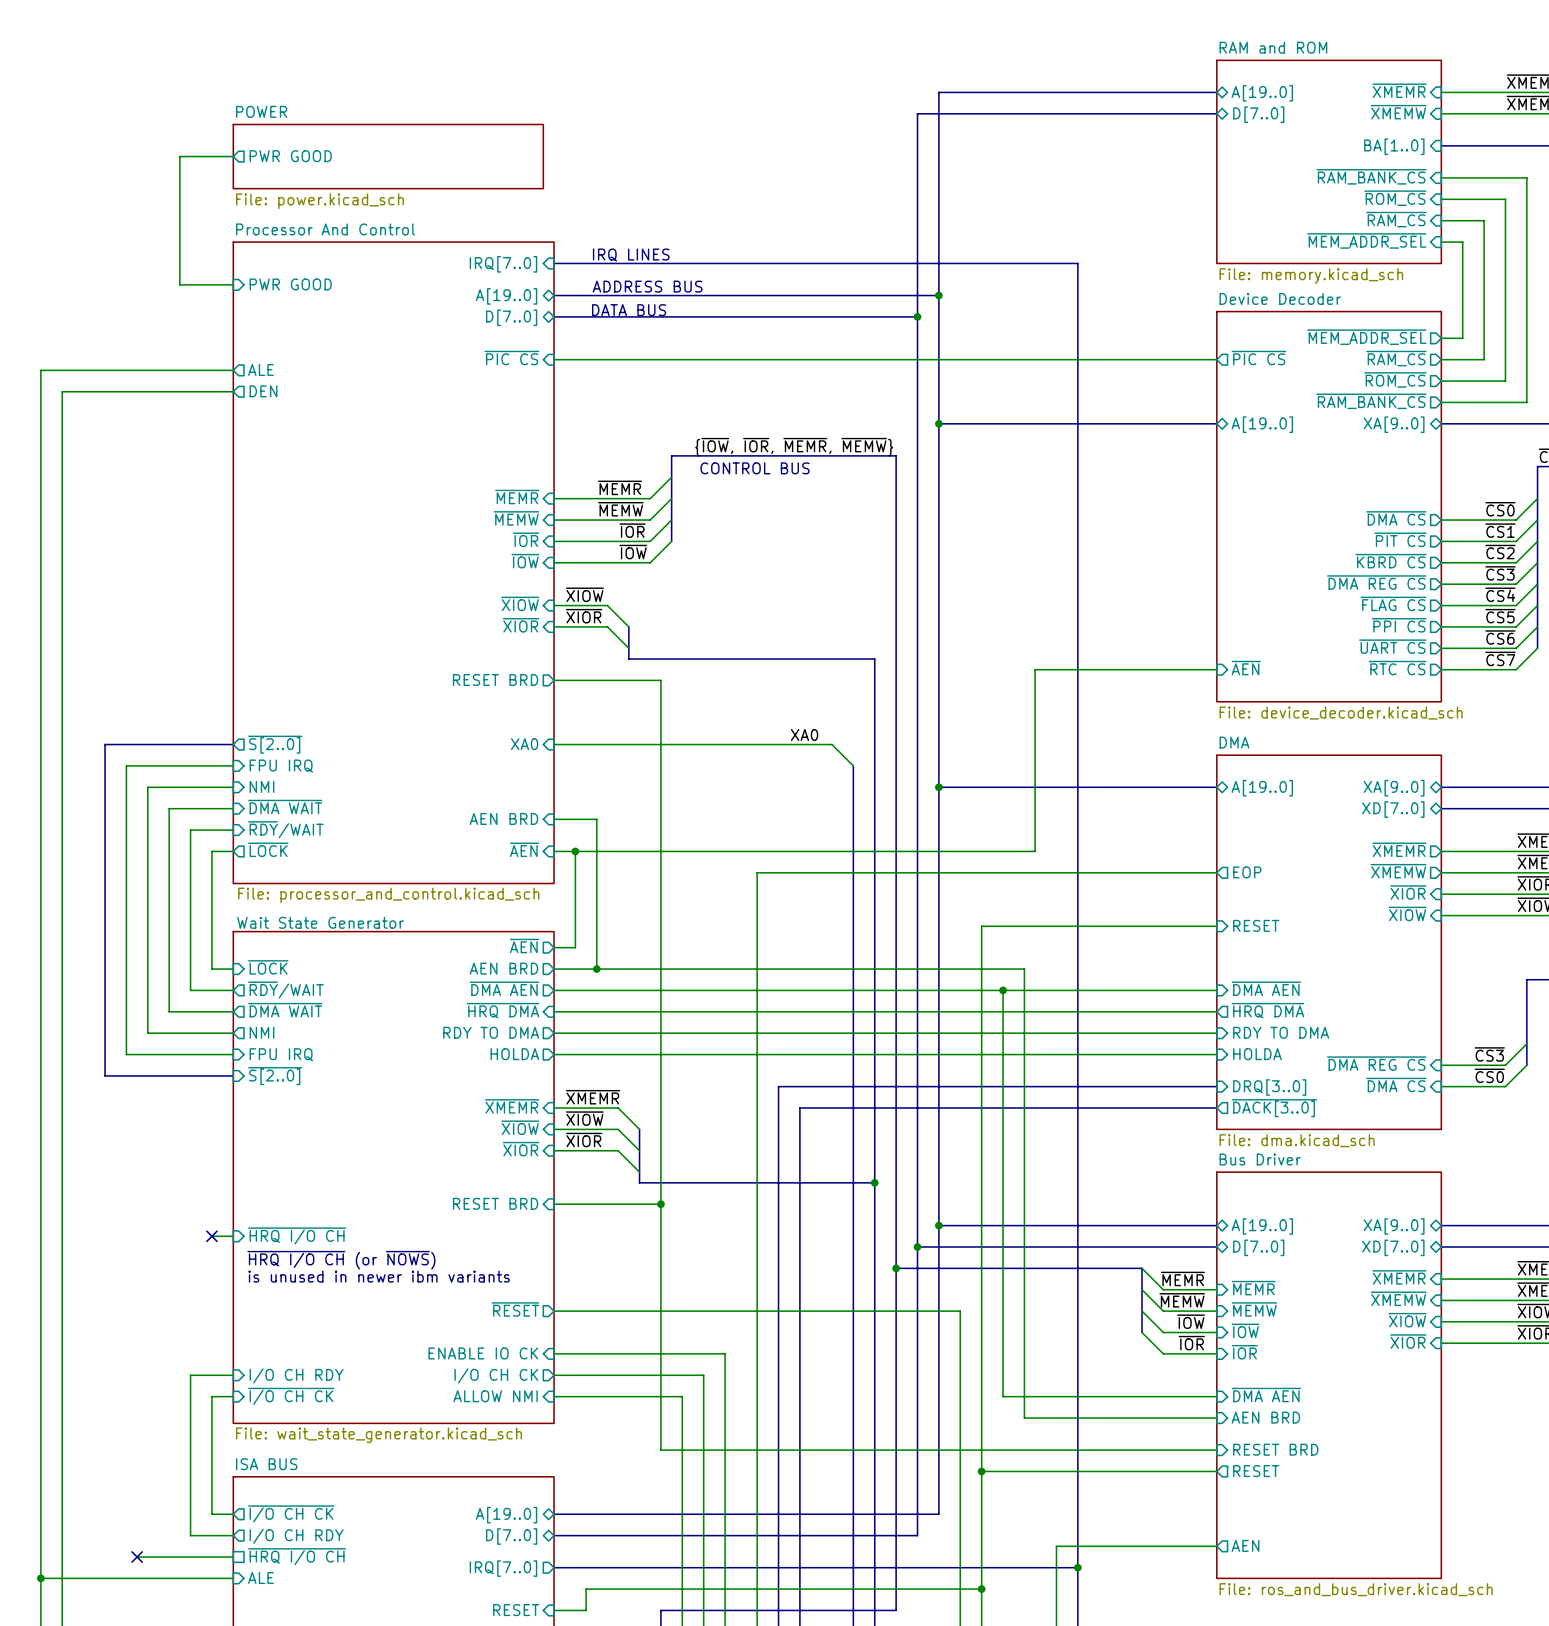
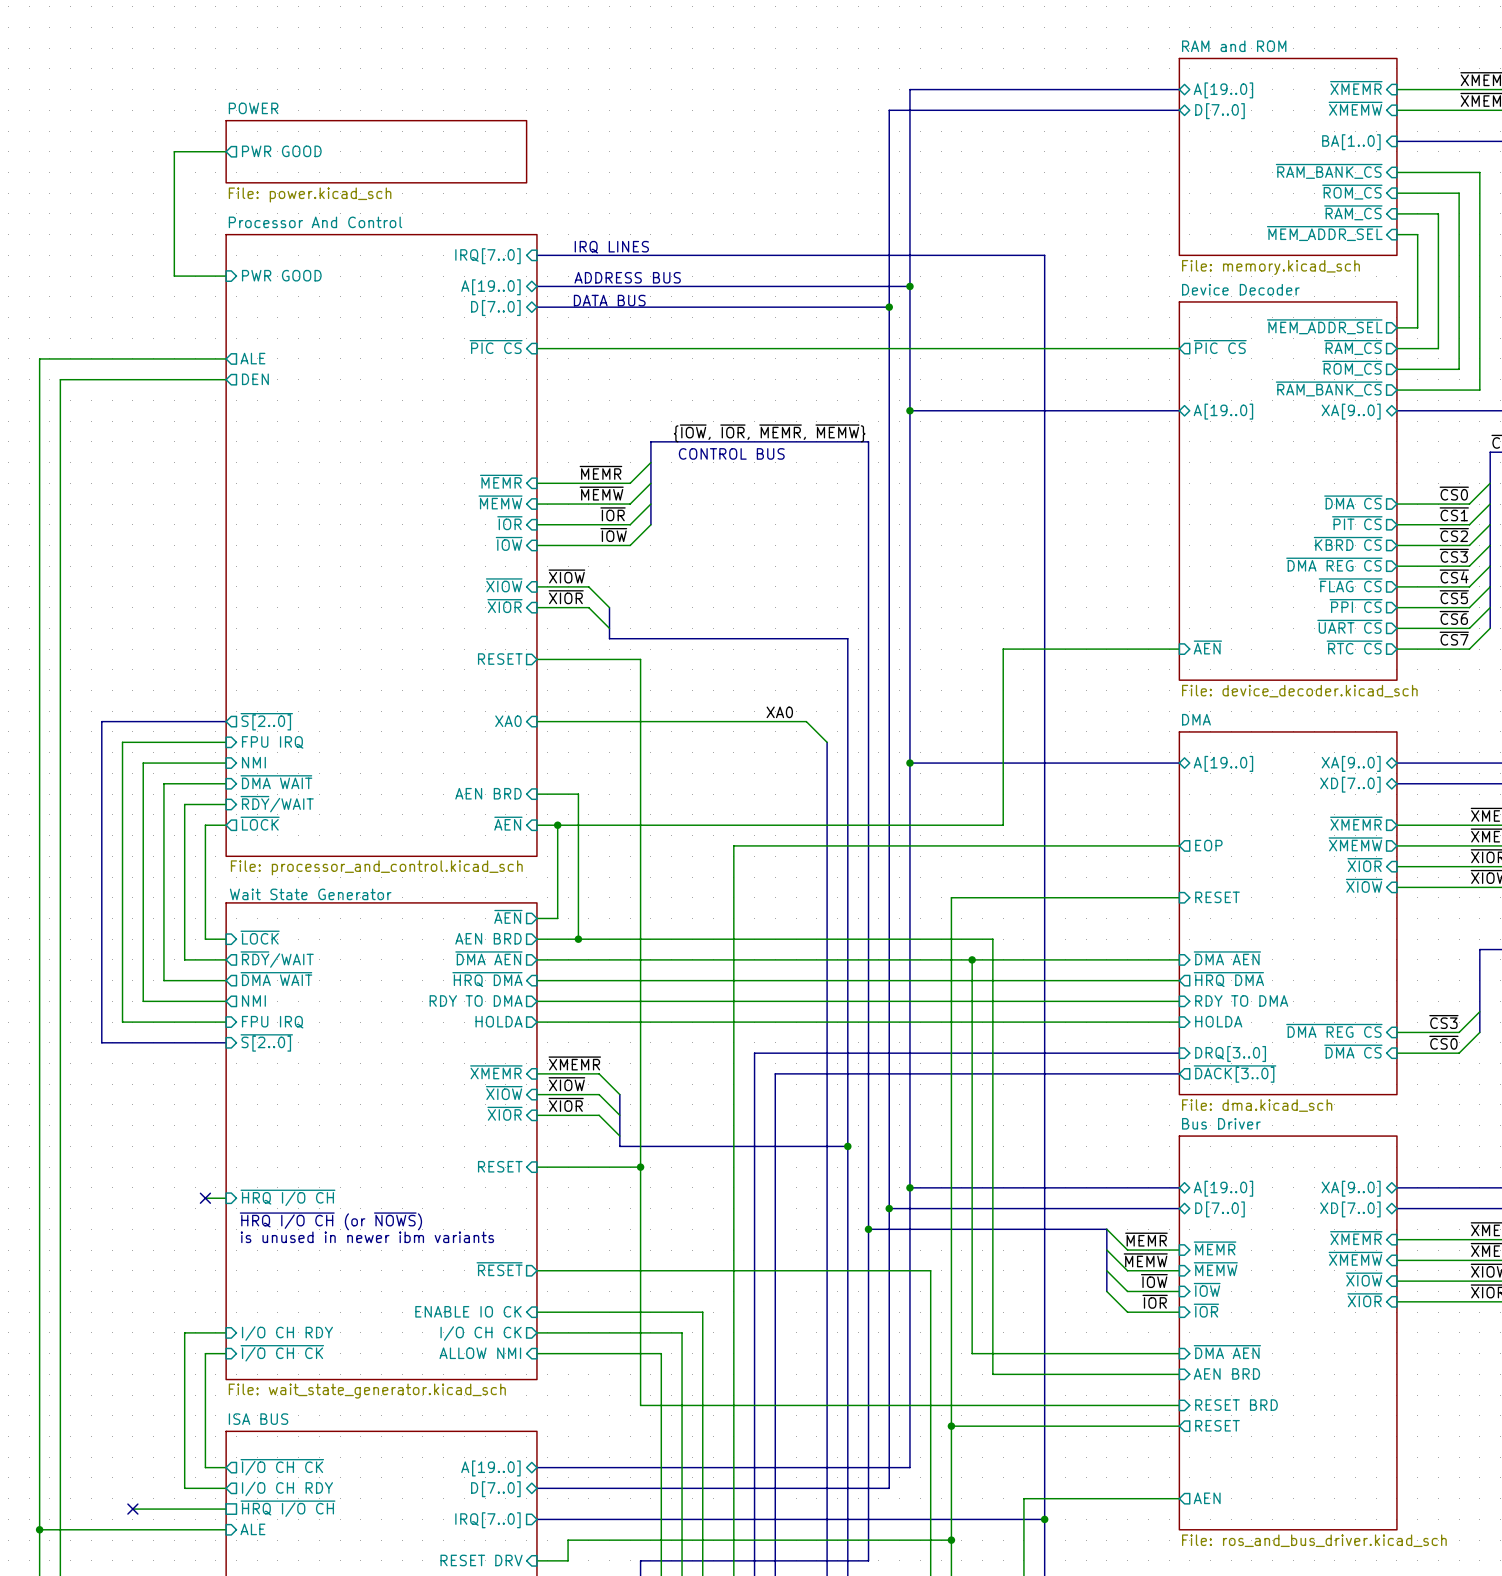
sheet pin: RESET BRD (495, 679) -> RESET (500, 659)
sheet pin: RESET BRD (495, 1203) -> RESET (500, 1166)
sheet pin: RESET (516, 1610) -> RESET DRV (481, 1560)

